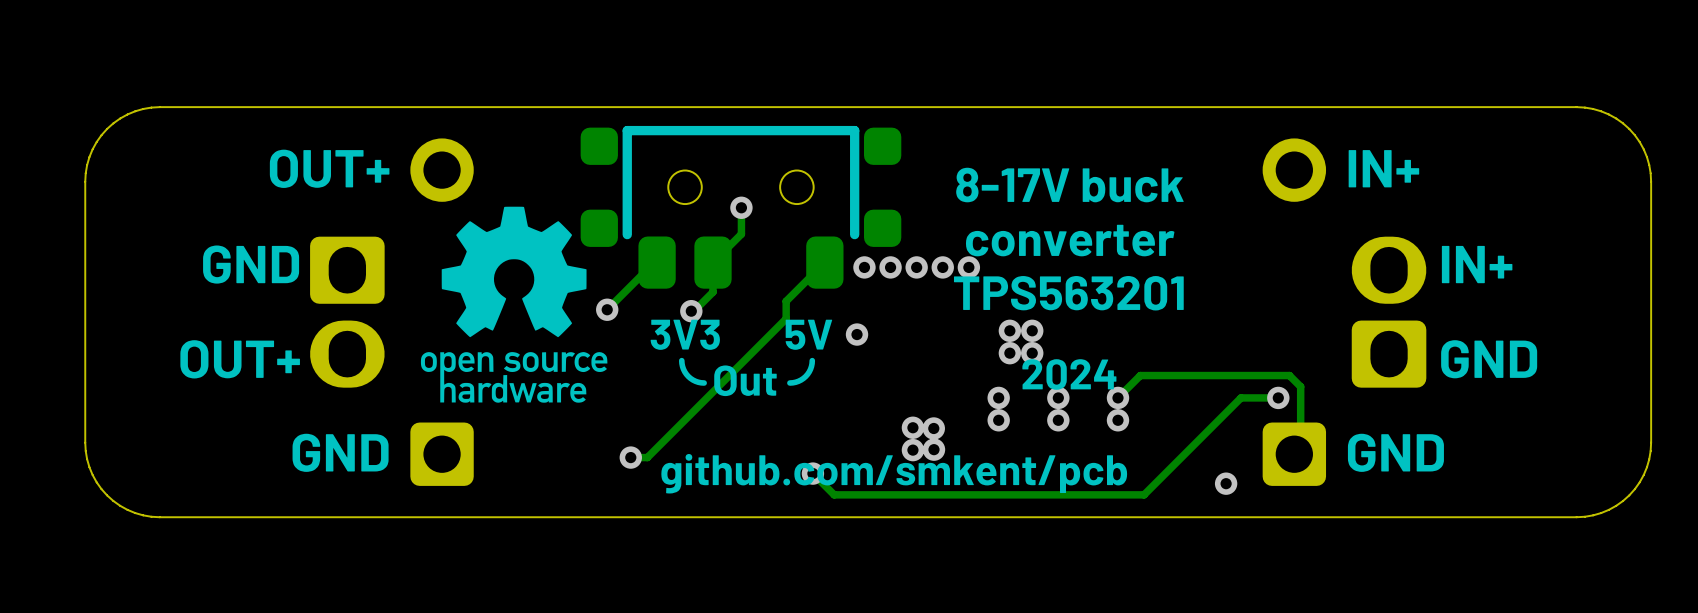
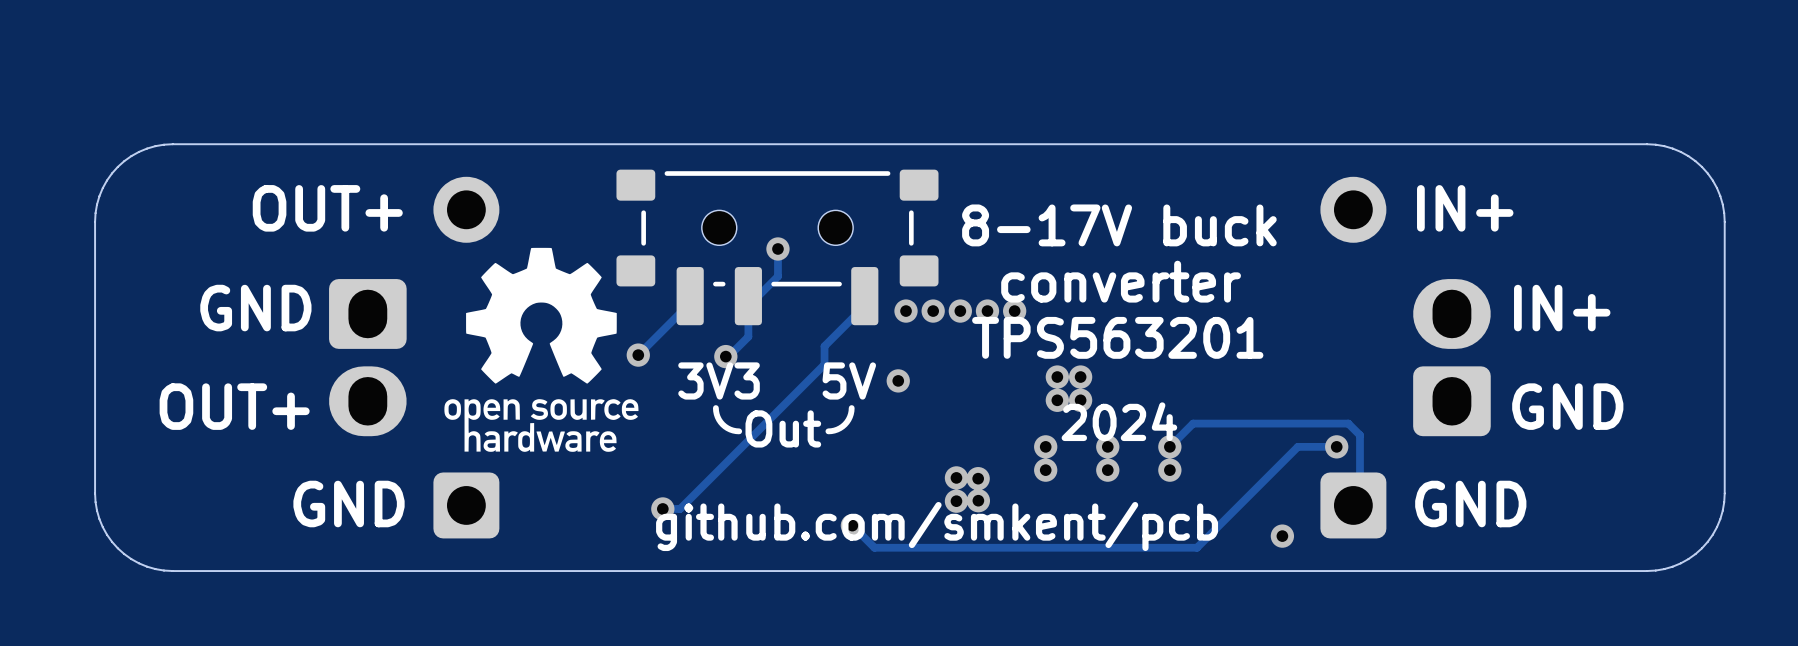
part footprint: [580, 125, 902, 289] -> [616, 169, 939, 326]

